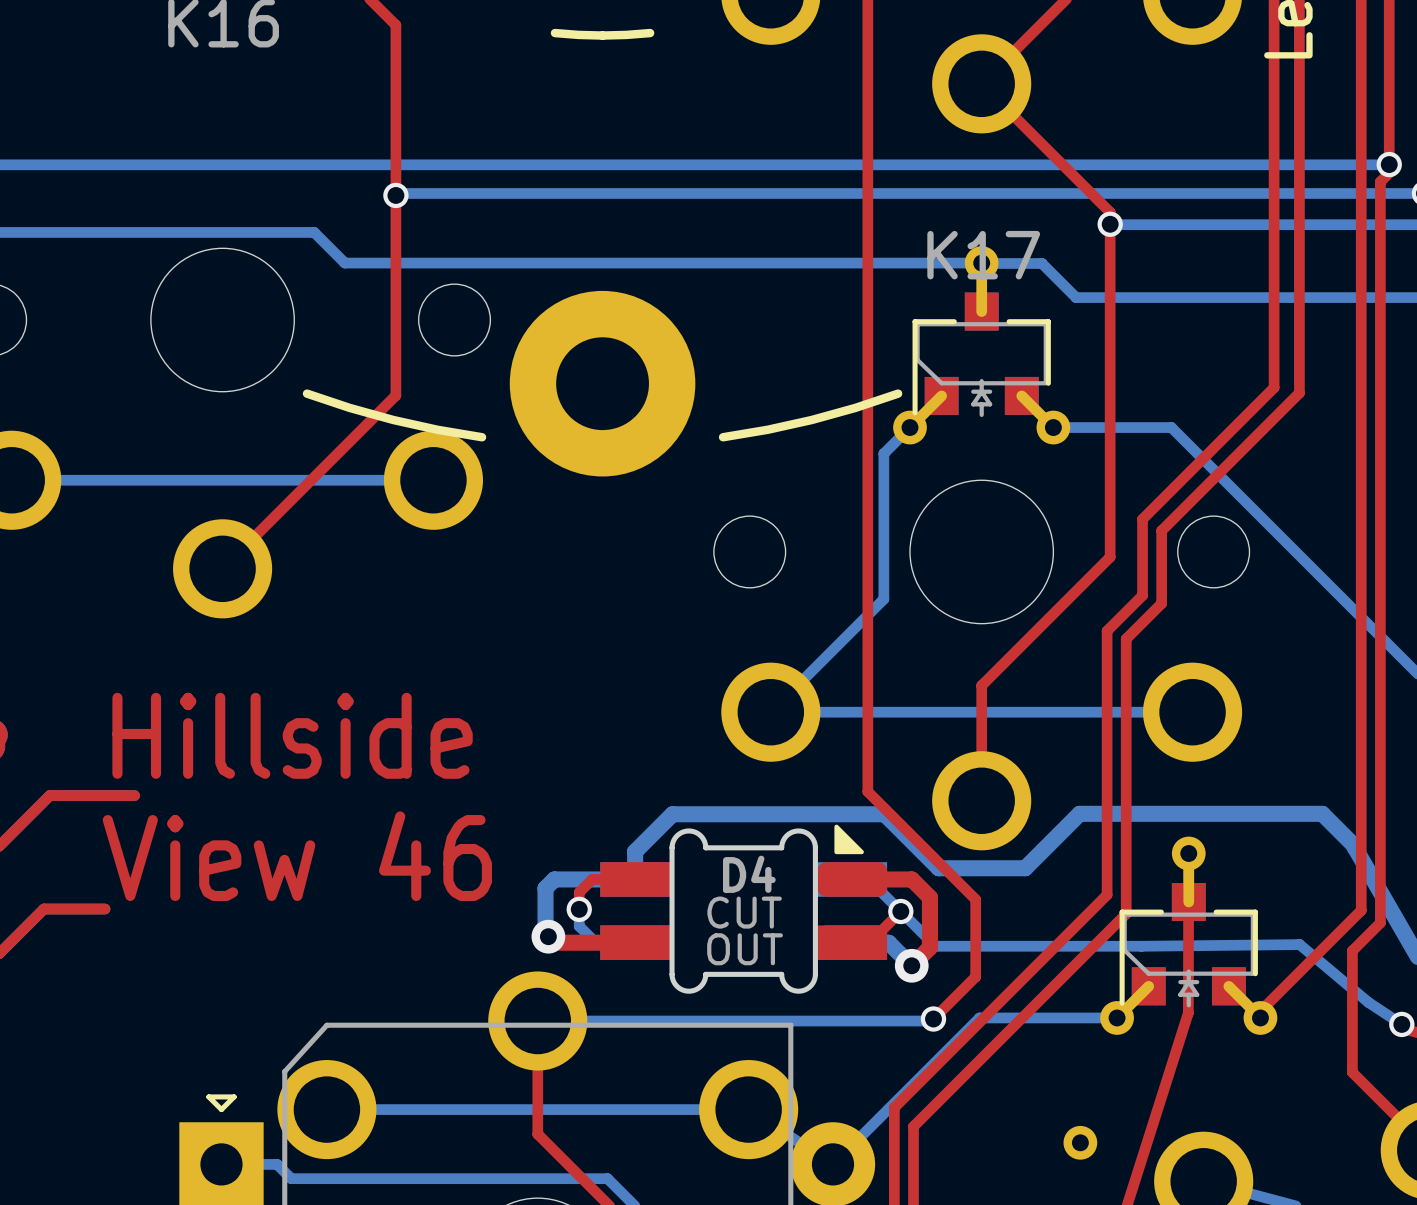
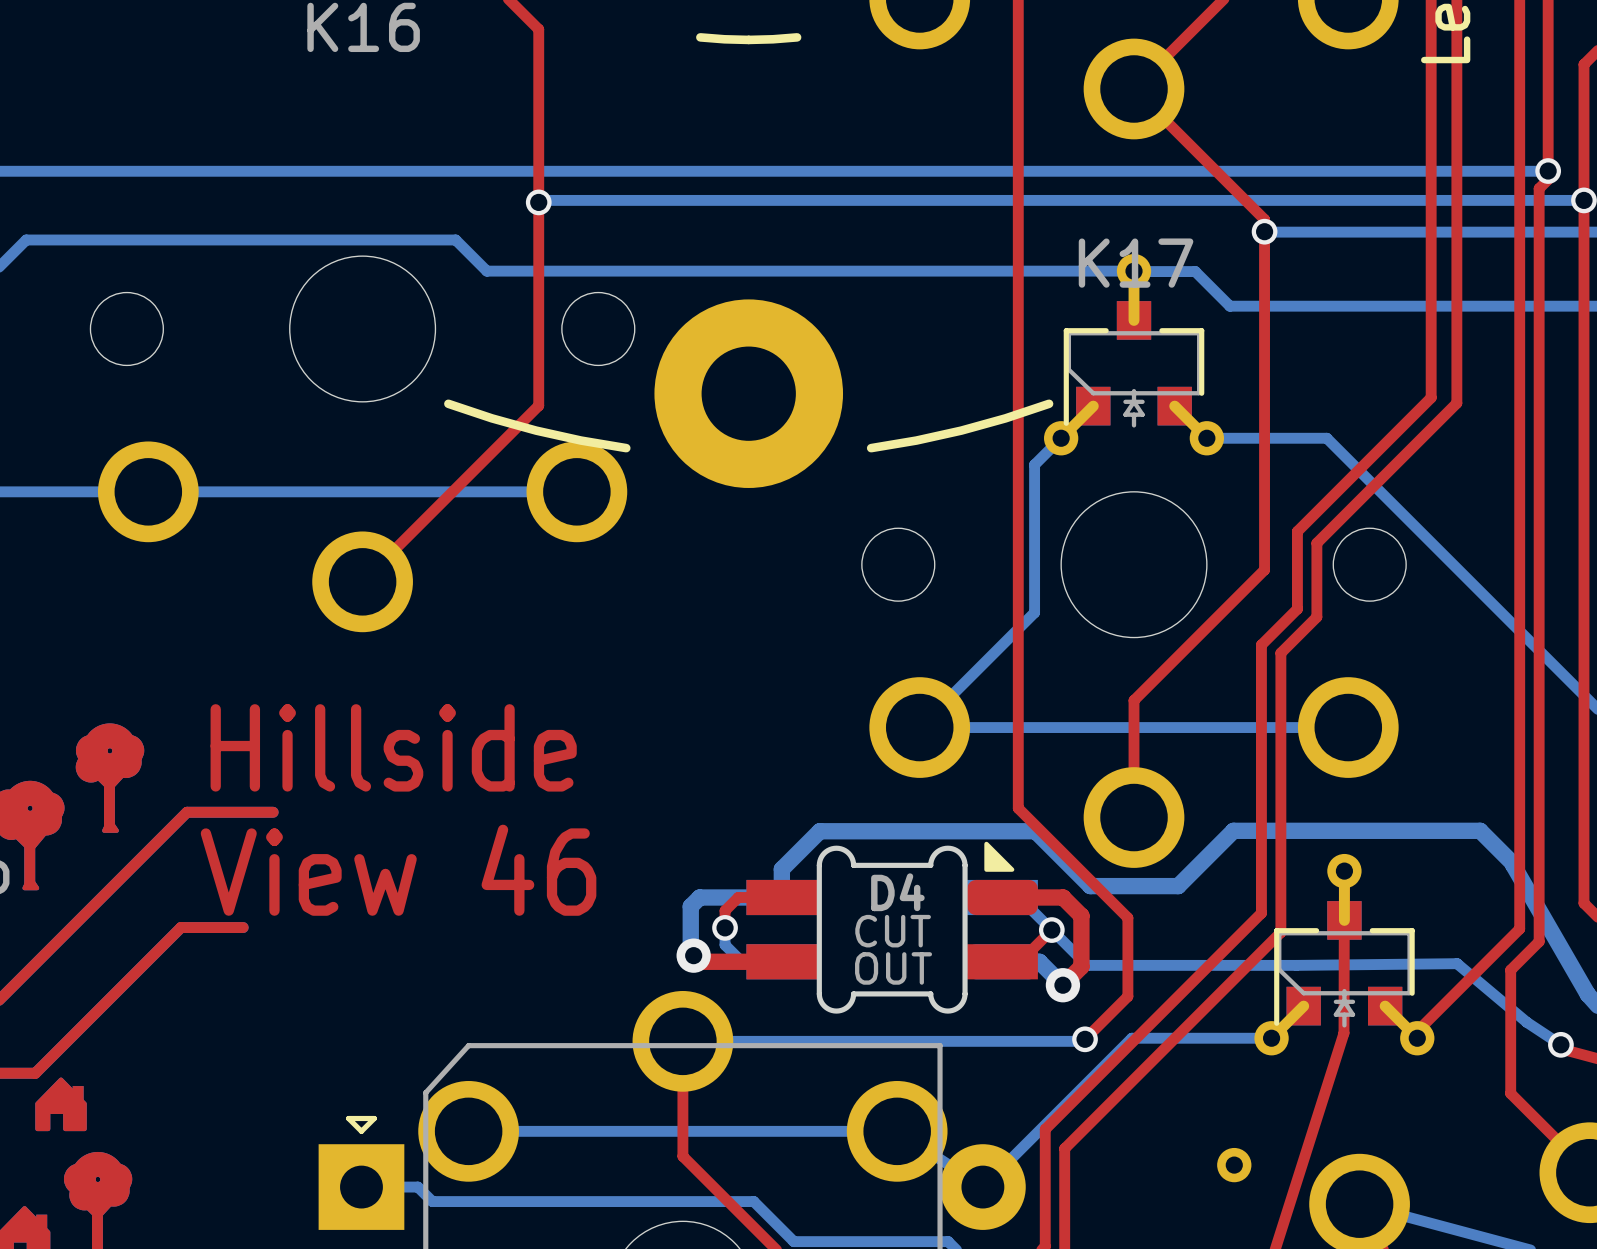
text position: Hillside (292, 735) -> Hillside (393, 747)
text position: View 46 (297, 856) -> View 46 (398, 870)

